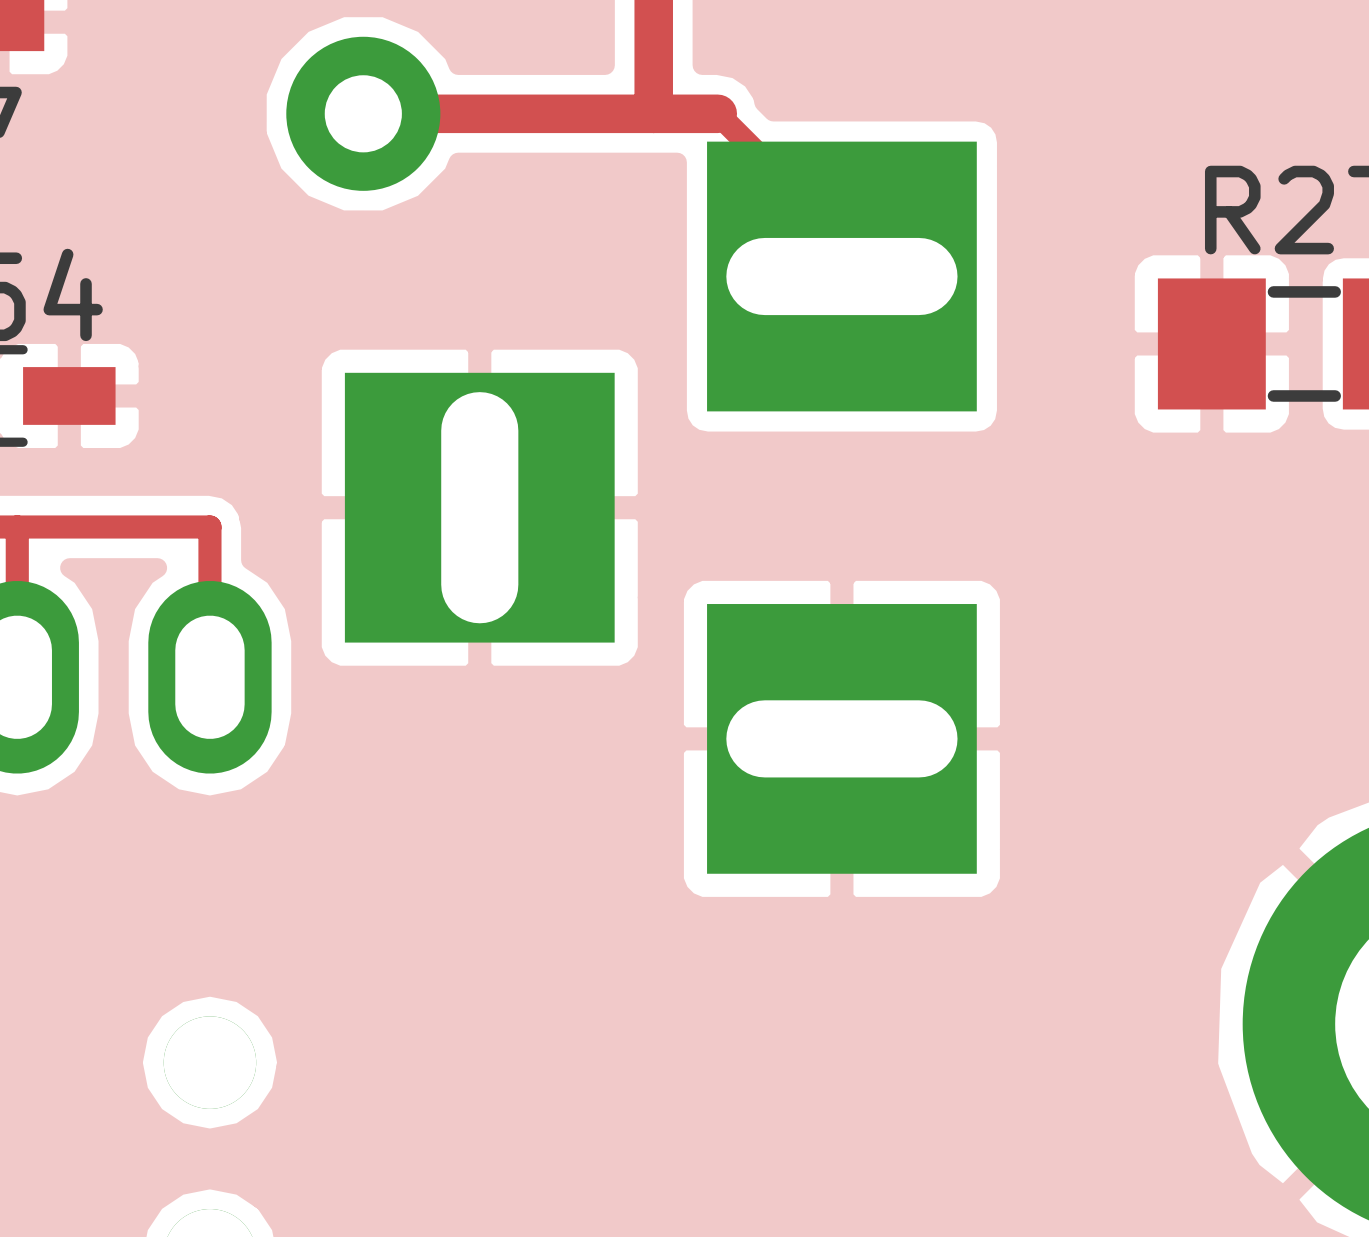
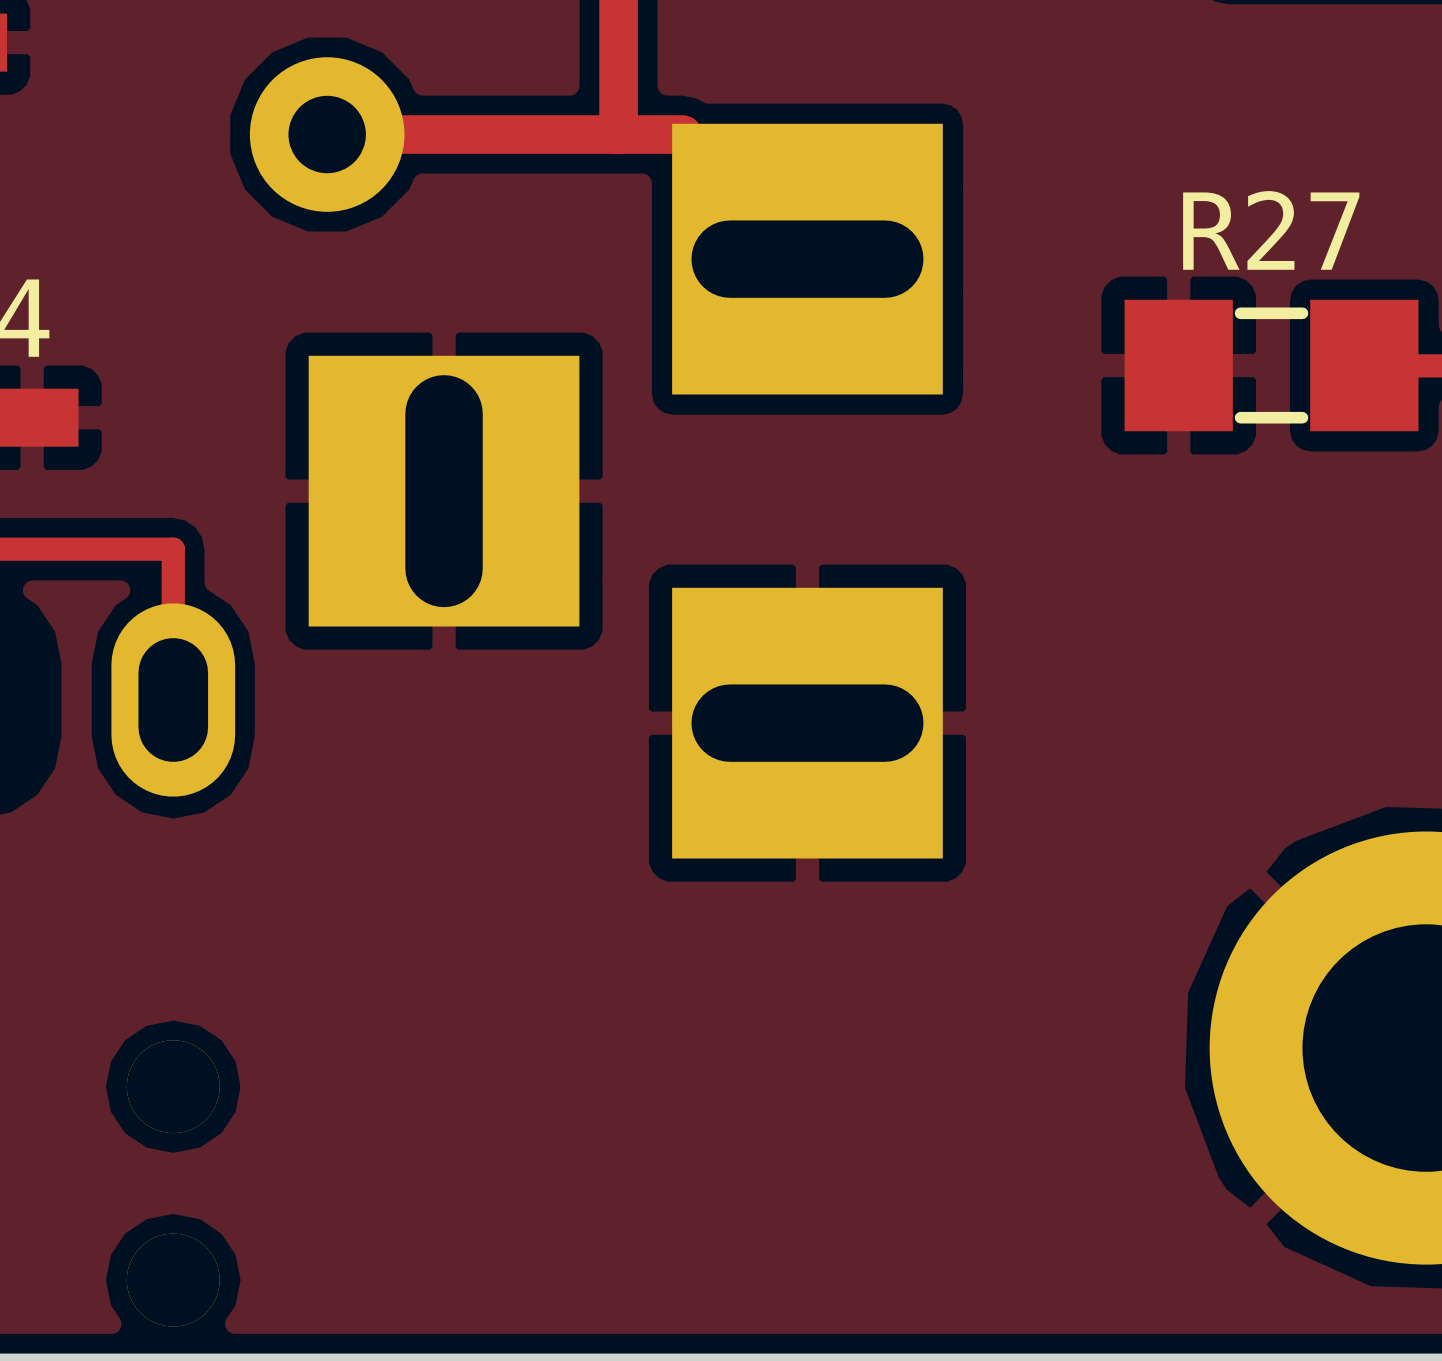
part position: (660, 507) -> (625, 491)

